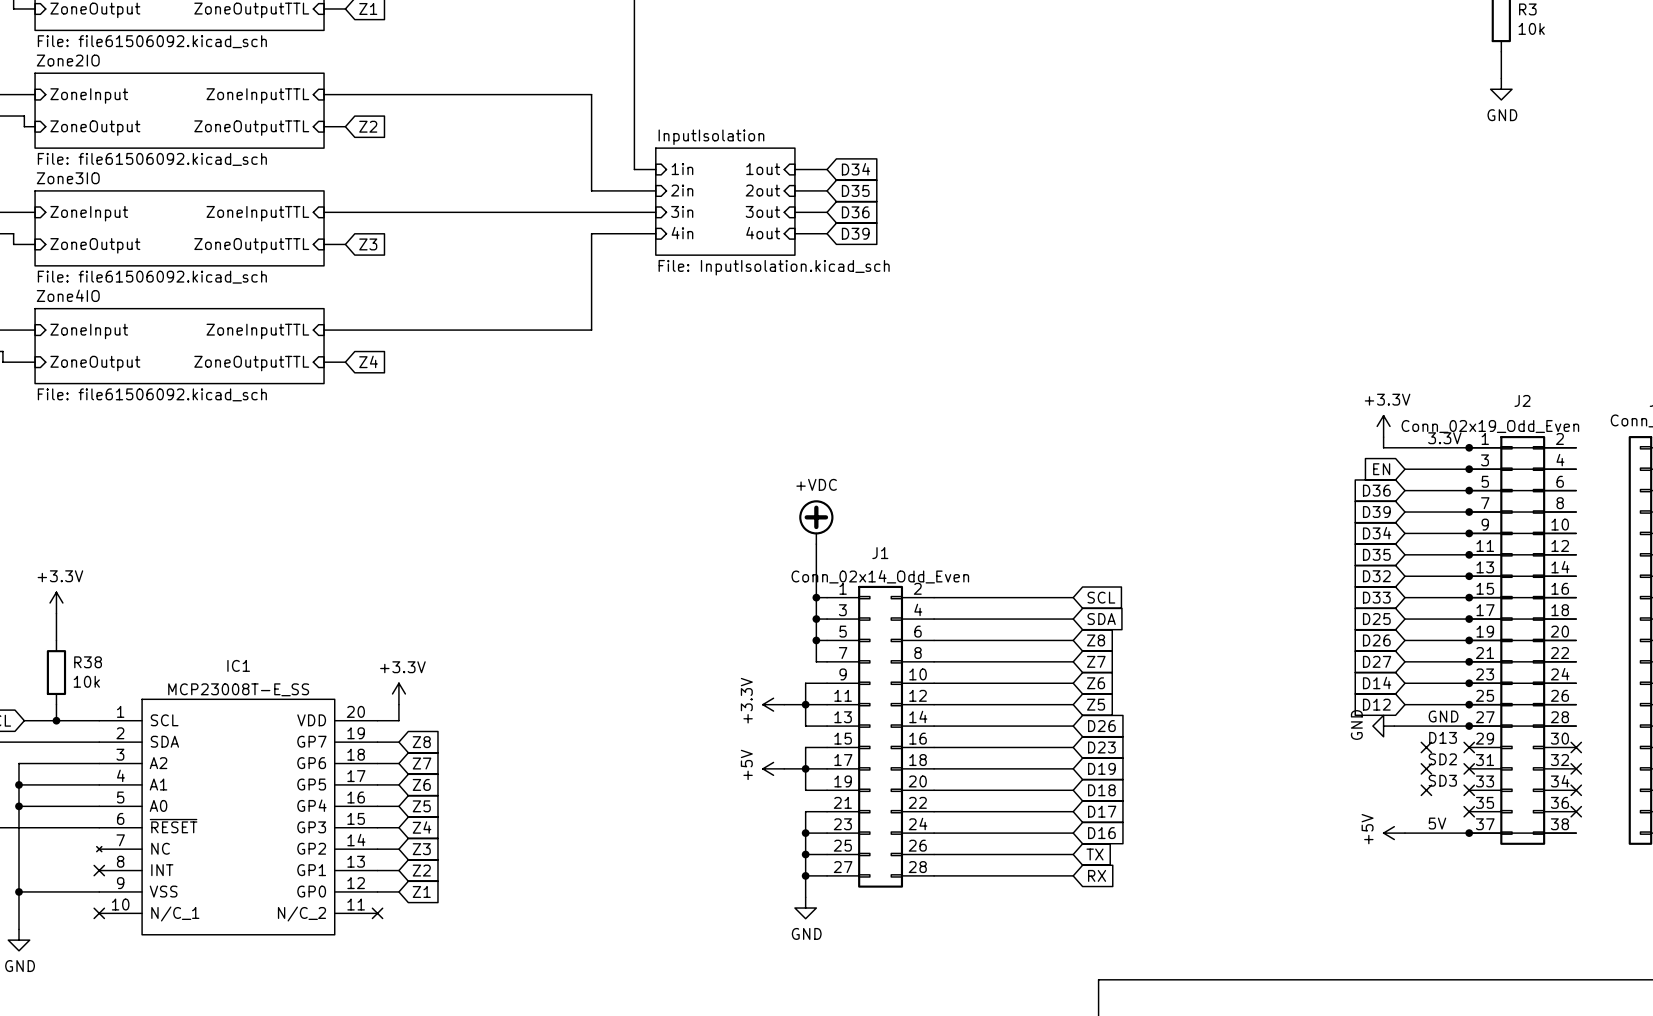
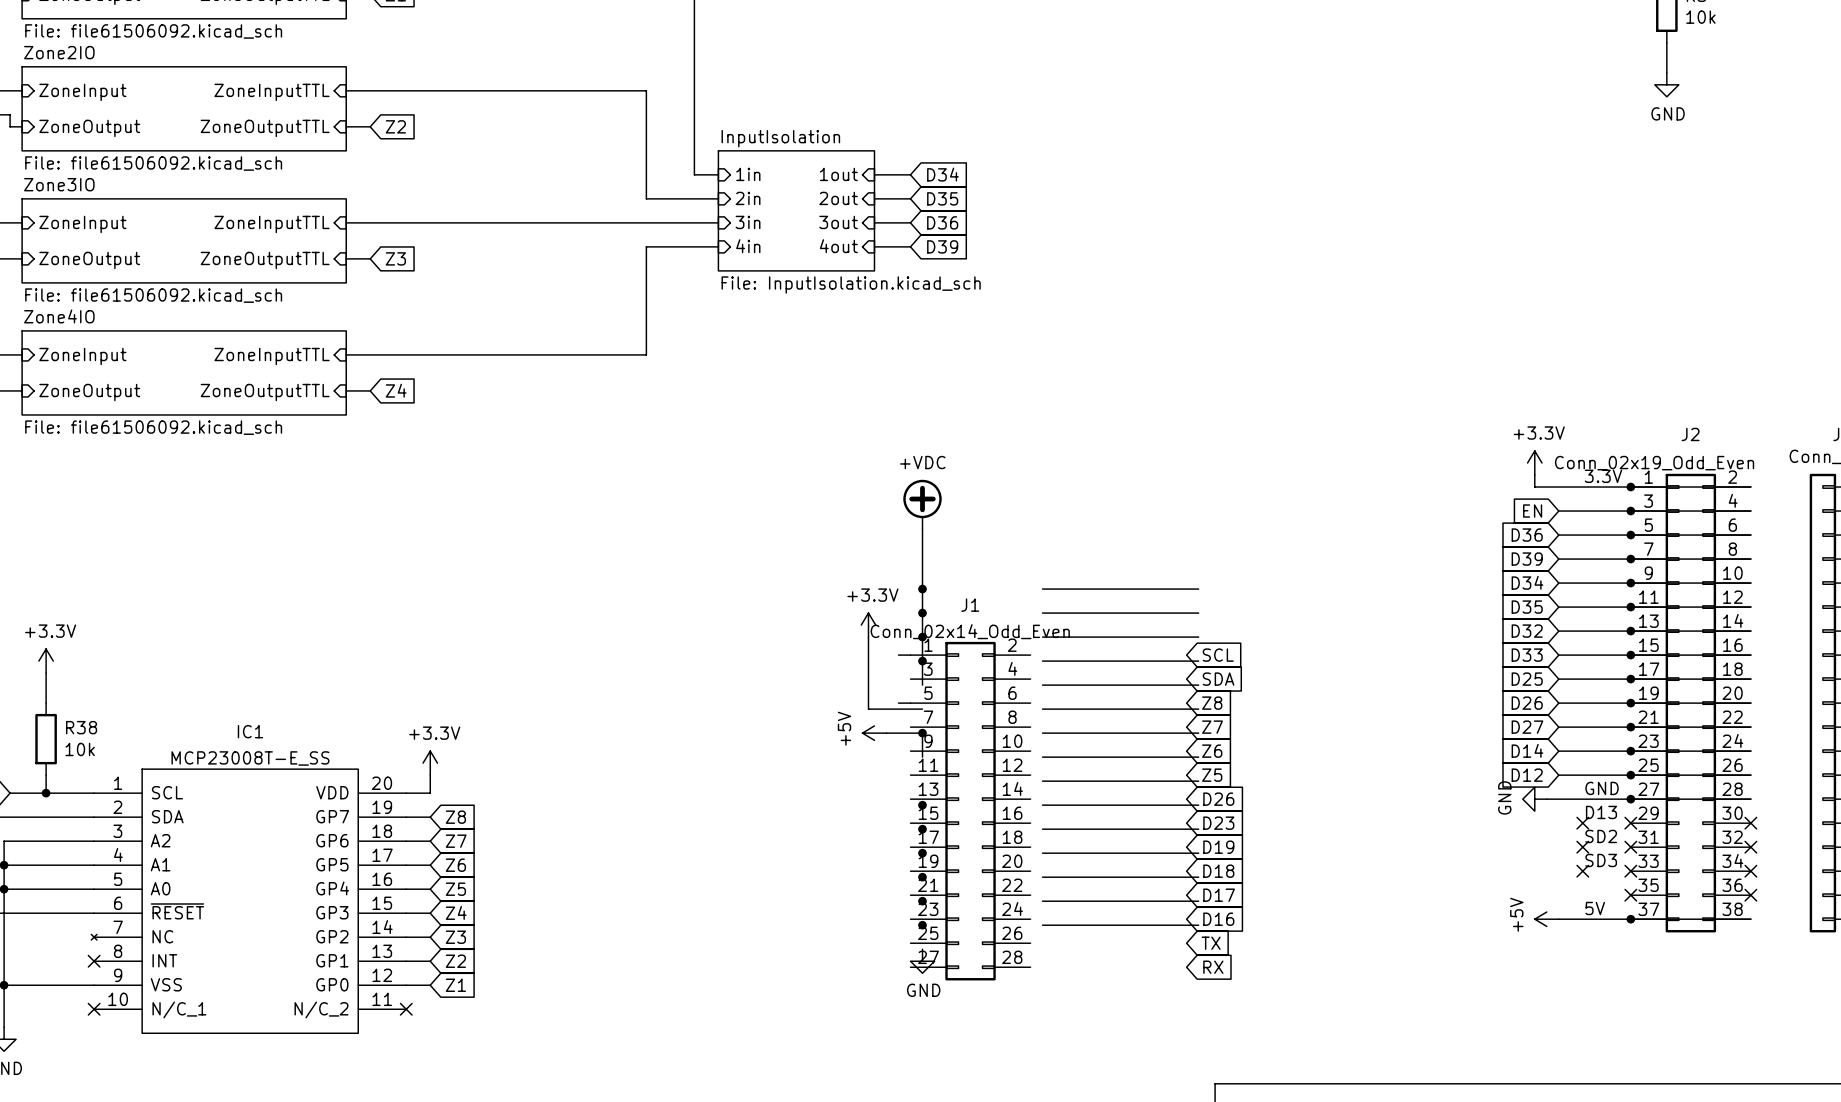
wire: none -> (922, 529) (922, 685)
power symbol position: +VDC (816, 522) -> +VDC (922, 504)
junction: none -> (922, 589)
wire: none -> (1042, 589) (1198, 589)
wire: (816, 544) (816, 661) (827, 661) -> none
junction: none -> (922, 613)
wire: none -> (868, 637) (868, 709) (922, 709)
junction: none -> (922, 637)
junction: (816, 597) -> none
wire: (934, 597) (1073, 597) -> (1042, 613) (1198, 613)
junction: none -> (922, 661)
wire: (816, 619) (827, 619) -> none
junction: (816, 619) -> none
wire: (934, 619) (1073, 619) -> (1042, 637) (1198, 637)
junction: (816, 640) -> none
wire: (934, 640) (1073, 640) -> (1042, 661) (1198, 661)
wire: (934, 661) (1073, 661) -> (1042, 685) (1198, 685)
wire: none -> (886, 733) (922, 733) (922, 757)
junction: none -> (922, 733)
wire: (827, 683) (805, 683) (805, 726) (827, 726) -> none
wire: (934, 683) (1073, 683) -> (1042, 709) (1198, 709)
power symbol rotation: 0° (773, 704) -> 90° clockwise (868, 625)
power symbol position: +3.3V (773, 704) -> +3.3V (868, 625)
wire: (784, 704) (827, 704) -> none
junction: (805, 704) -> none
wire: (934, 704) (1073, 704) -> (1042, 733) (1198, 733)
wire: (934, 726) (1073, 726) -> (1042, 757) (1198, 757)
junction: none -> (922, 805)
wire: (827, 747) (805, 747) (805, 790) (827, 790) -> none
wire: (934, 747) (1073, 747) -> (1042, 781) (1198, 781)
junction: none -> (922, 829)
power symbol position: +5V (773, 768) -> +5V (874, 733)
wire: (784, 768) (827, 768) -> none
junction: (805, 768) -> none
wire: (934, 768) (1073, 768) -> (1042, 805) (1198, 805)
junction: none -> (922, 853)
wire: (934, 790) (1073, 790) -> (1042, 829) (1198, 829)
junction: none -> (922, 877)
wire: (827, 811) (805, 811) (805, 897) -> none
wire: (934, 811) (1073, 811) -> (1042, 853) (1198, 853)
junction: none -> (922, 901)
wire: (805, 833) (827, 833) -> none
junction: (805, 833) -> none
wire: (934, 833) (1073, 833) -> (1042, 877) (1198, 877)
junction: none -> (922, 925)
wire: (805, 854) (827, 854) -> none
junction: (805, 854) -> none
wire: (934, 854) (1073, 854) -> (1042, 901) (1198, 901)
wire: (805, 875) (827, 875) -> none
junction: (805, 875) -> none
wire: (934, 875) (1073, 875) -> (1042, 925) (1198, 925)
power symbol position: GND (805, 908) -> GND (922, 961)

